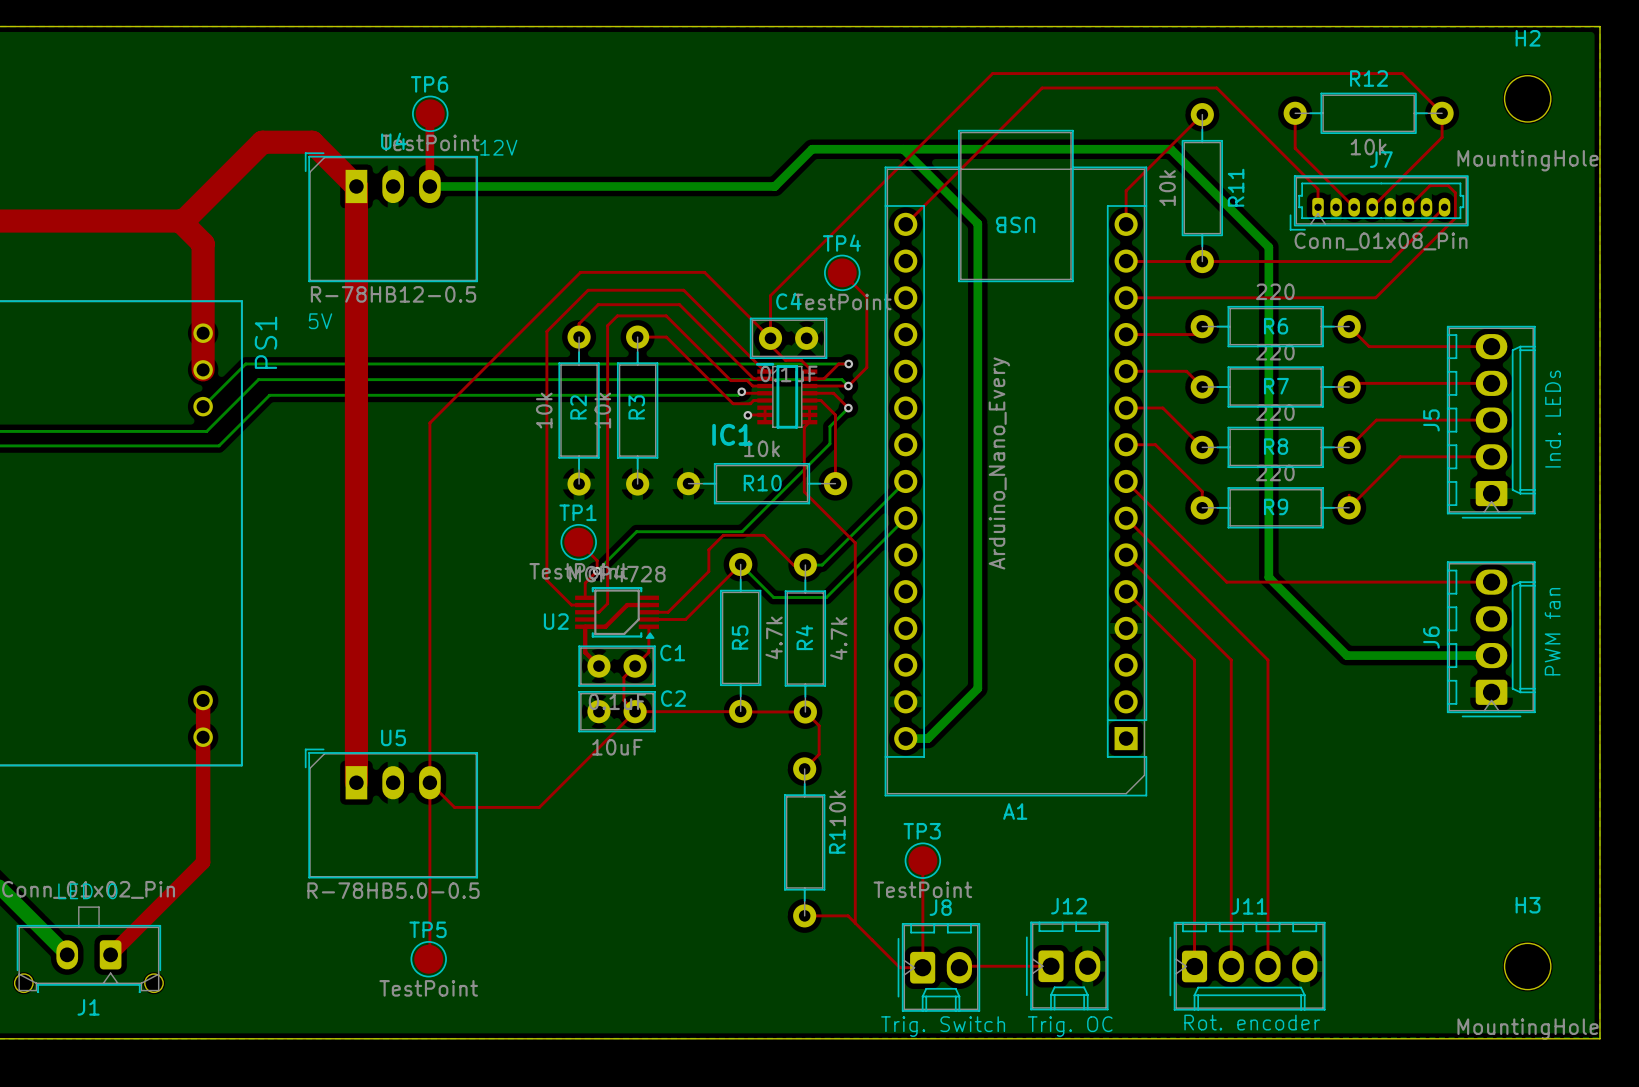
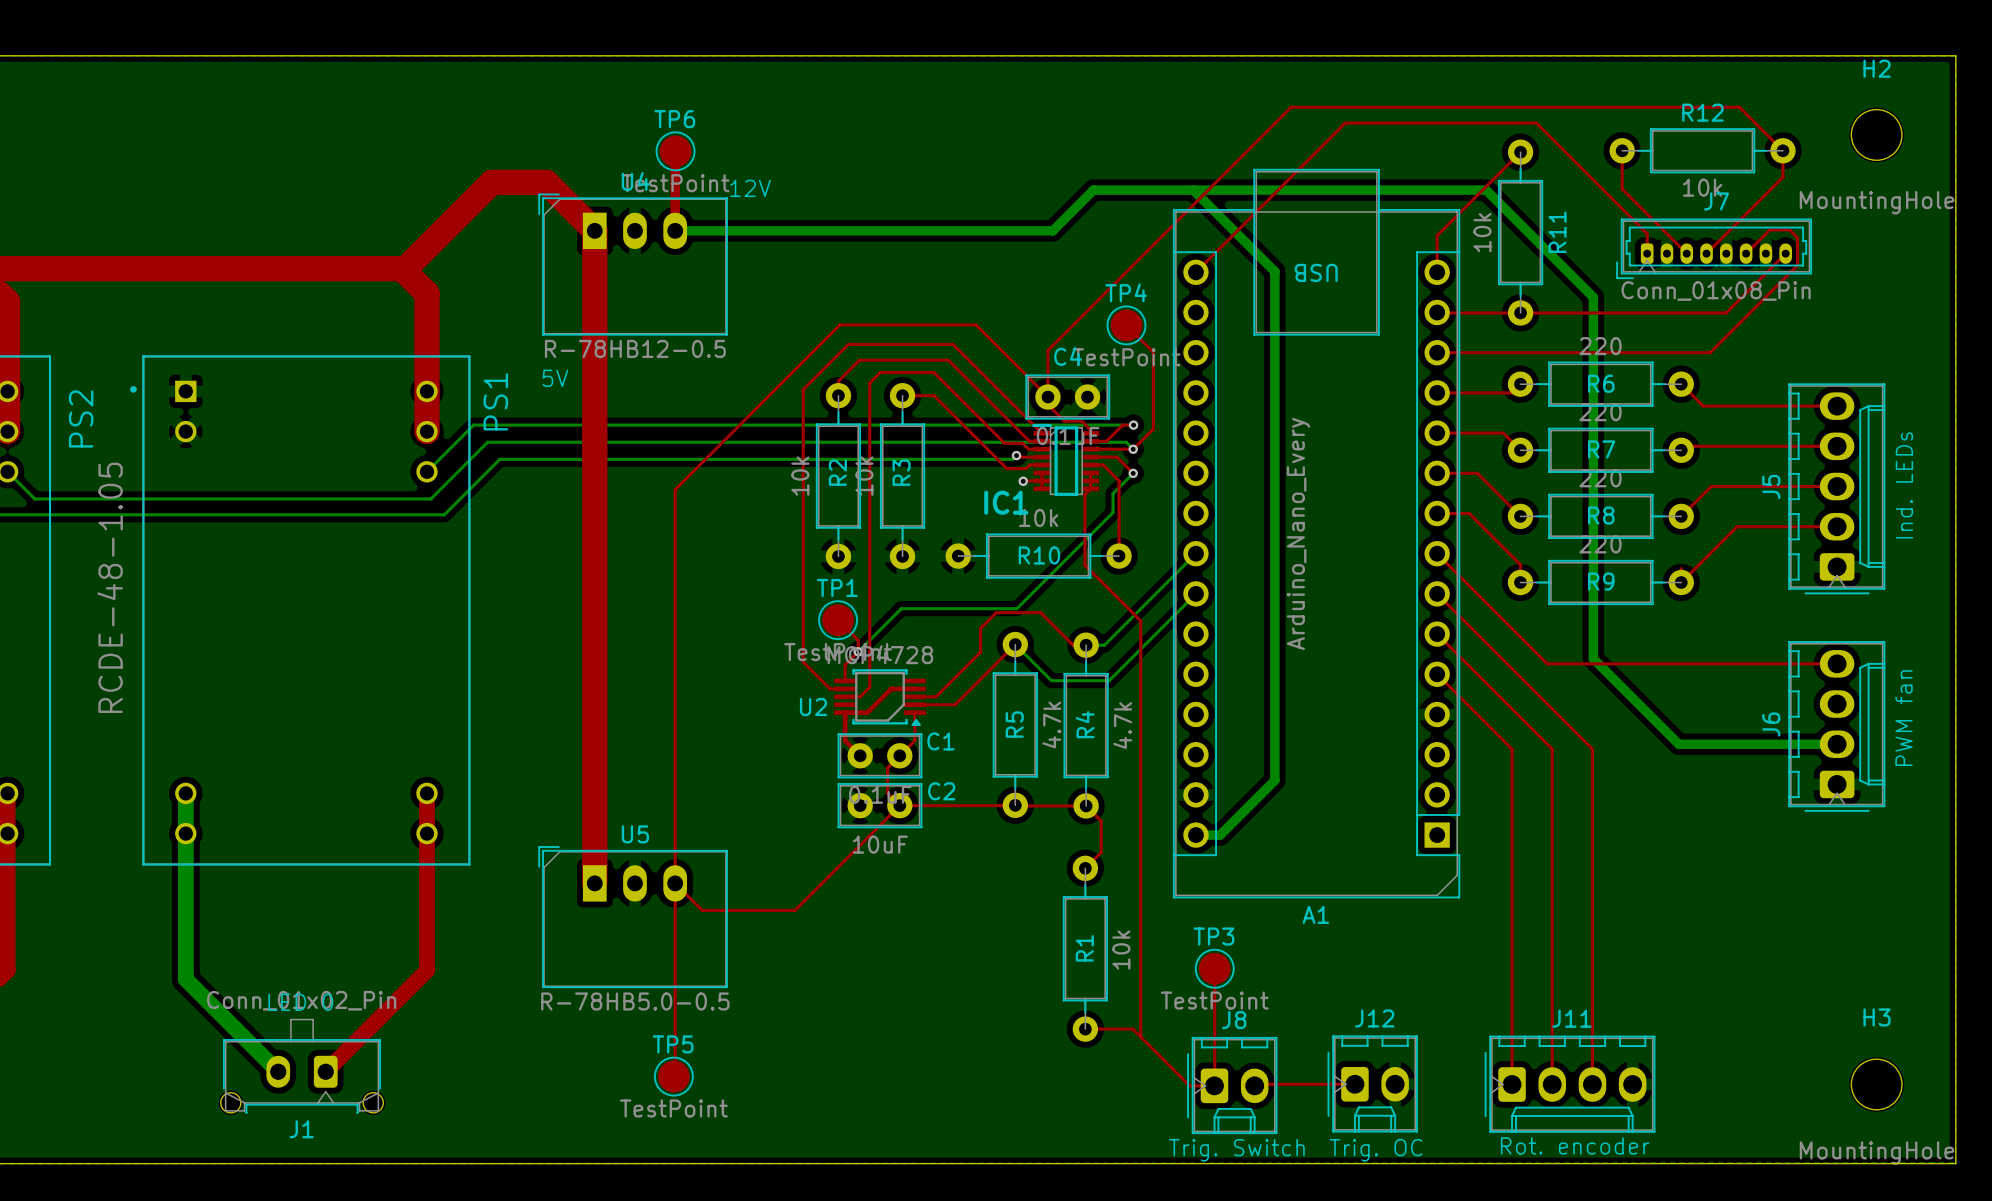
R1 value position: 10k (837, 808) -> 10k (1121, 949)
R1 name position: R1 (837, 841) -> R1 (1084, 948)

